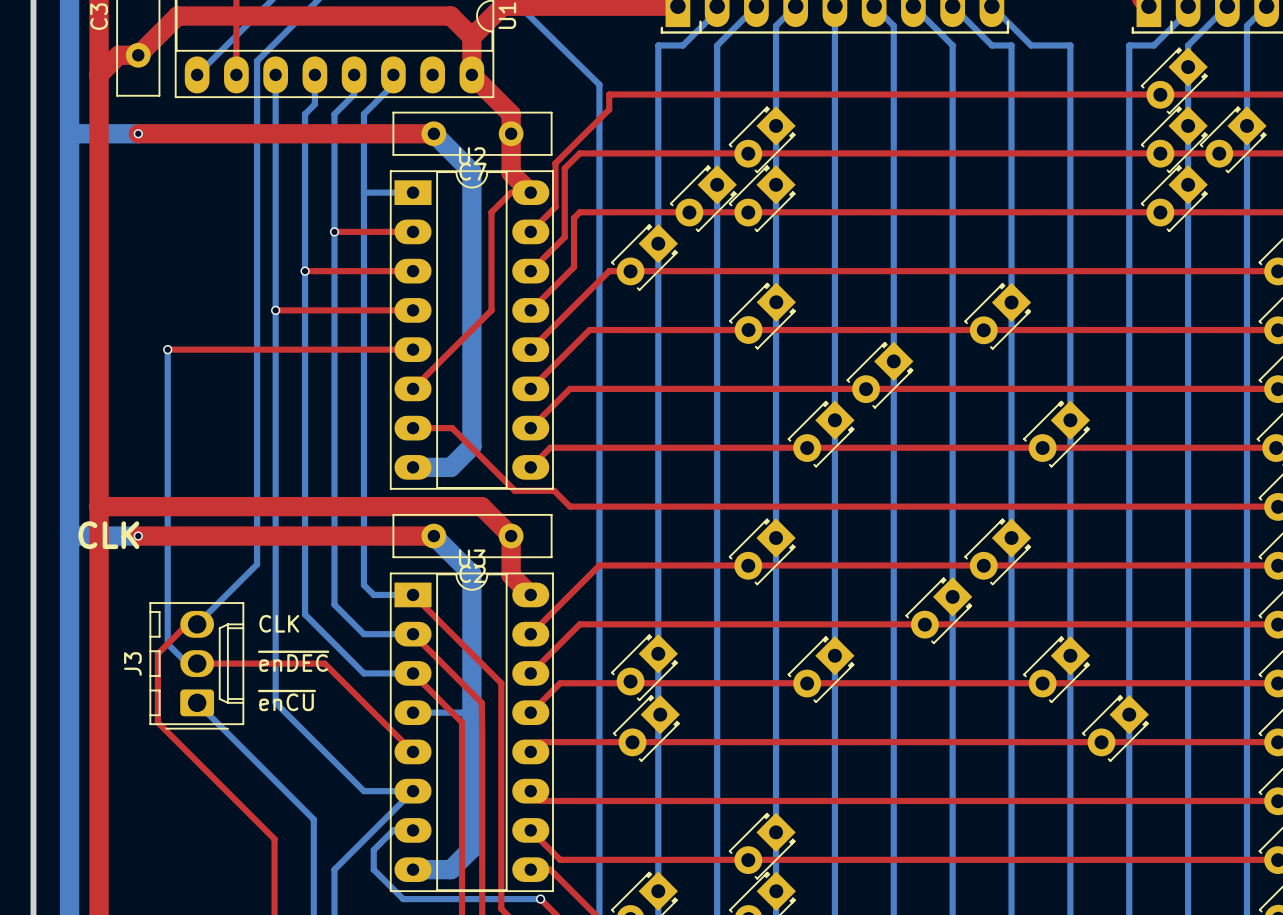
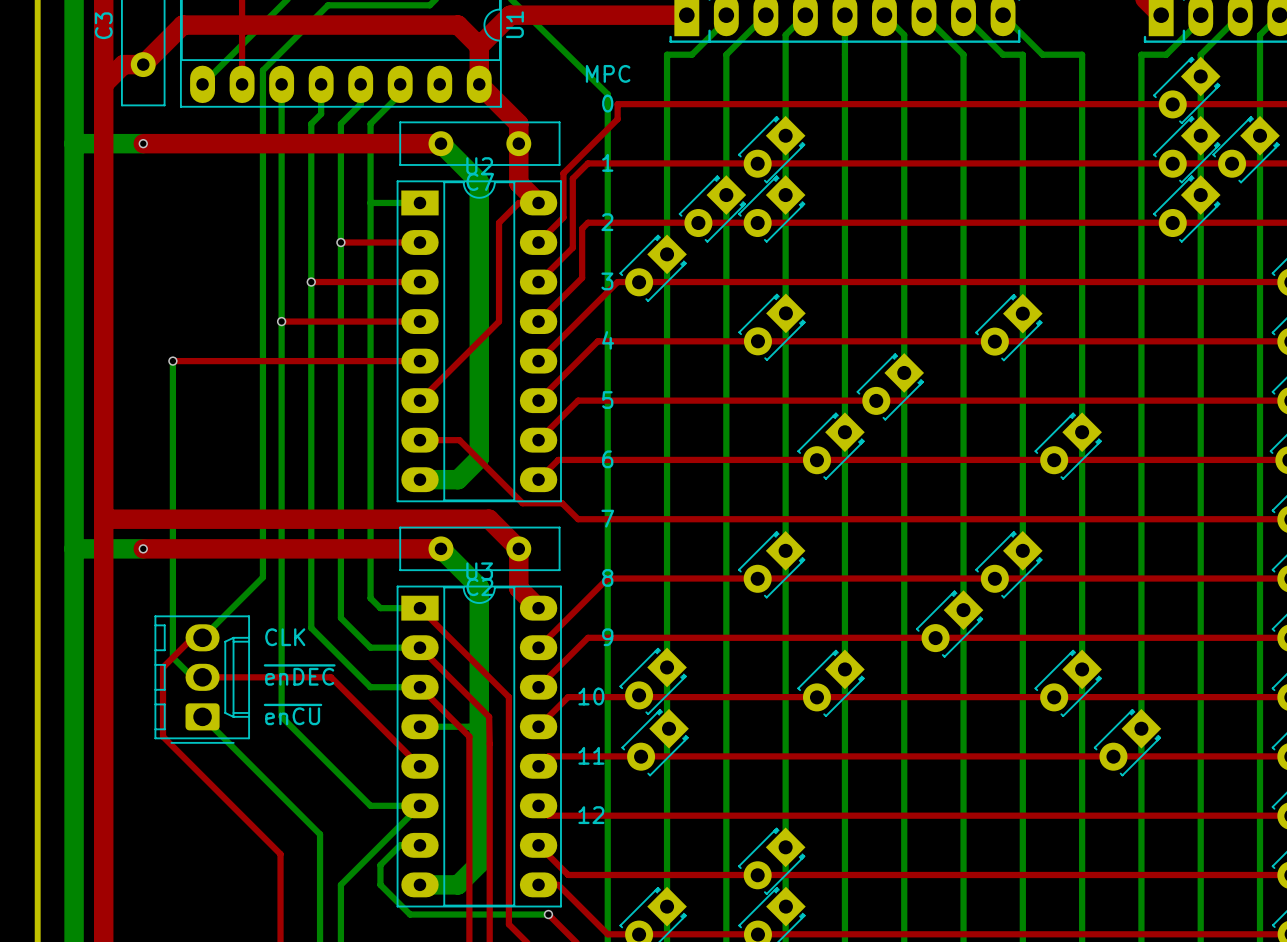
text: none -> MPC (608, 73)
text: none -> 0 (607, 103)
text: none -> 1 (607, 162)
text: none -> 2 (607, 222)
text: none -> 3 (607, 281)
text: none -> 4 (608, 340)
text: none -> 5 (607, 400)
text: none -> 6 (607, 459)
text: none -> 7 (607, 518)
text: CLK (108, 535) -> none
text: none -> 8 (607, 577)
text: none -> 9 (607, 637)
J3 name: J3 (132, 663) -> none
text: none -> 10 (591, 696)
text: none -> 11 (591, 755)
text: none -> 12 (591, 815)

